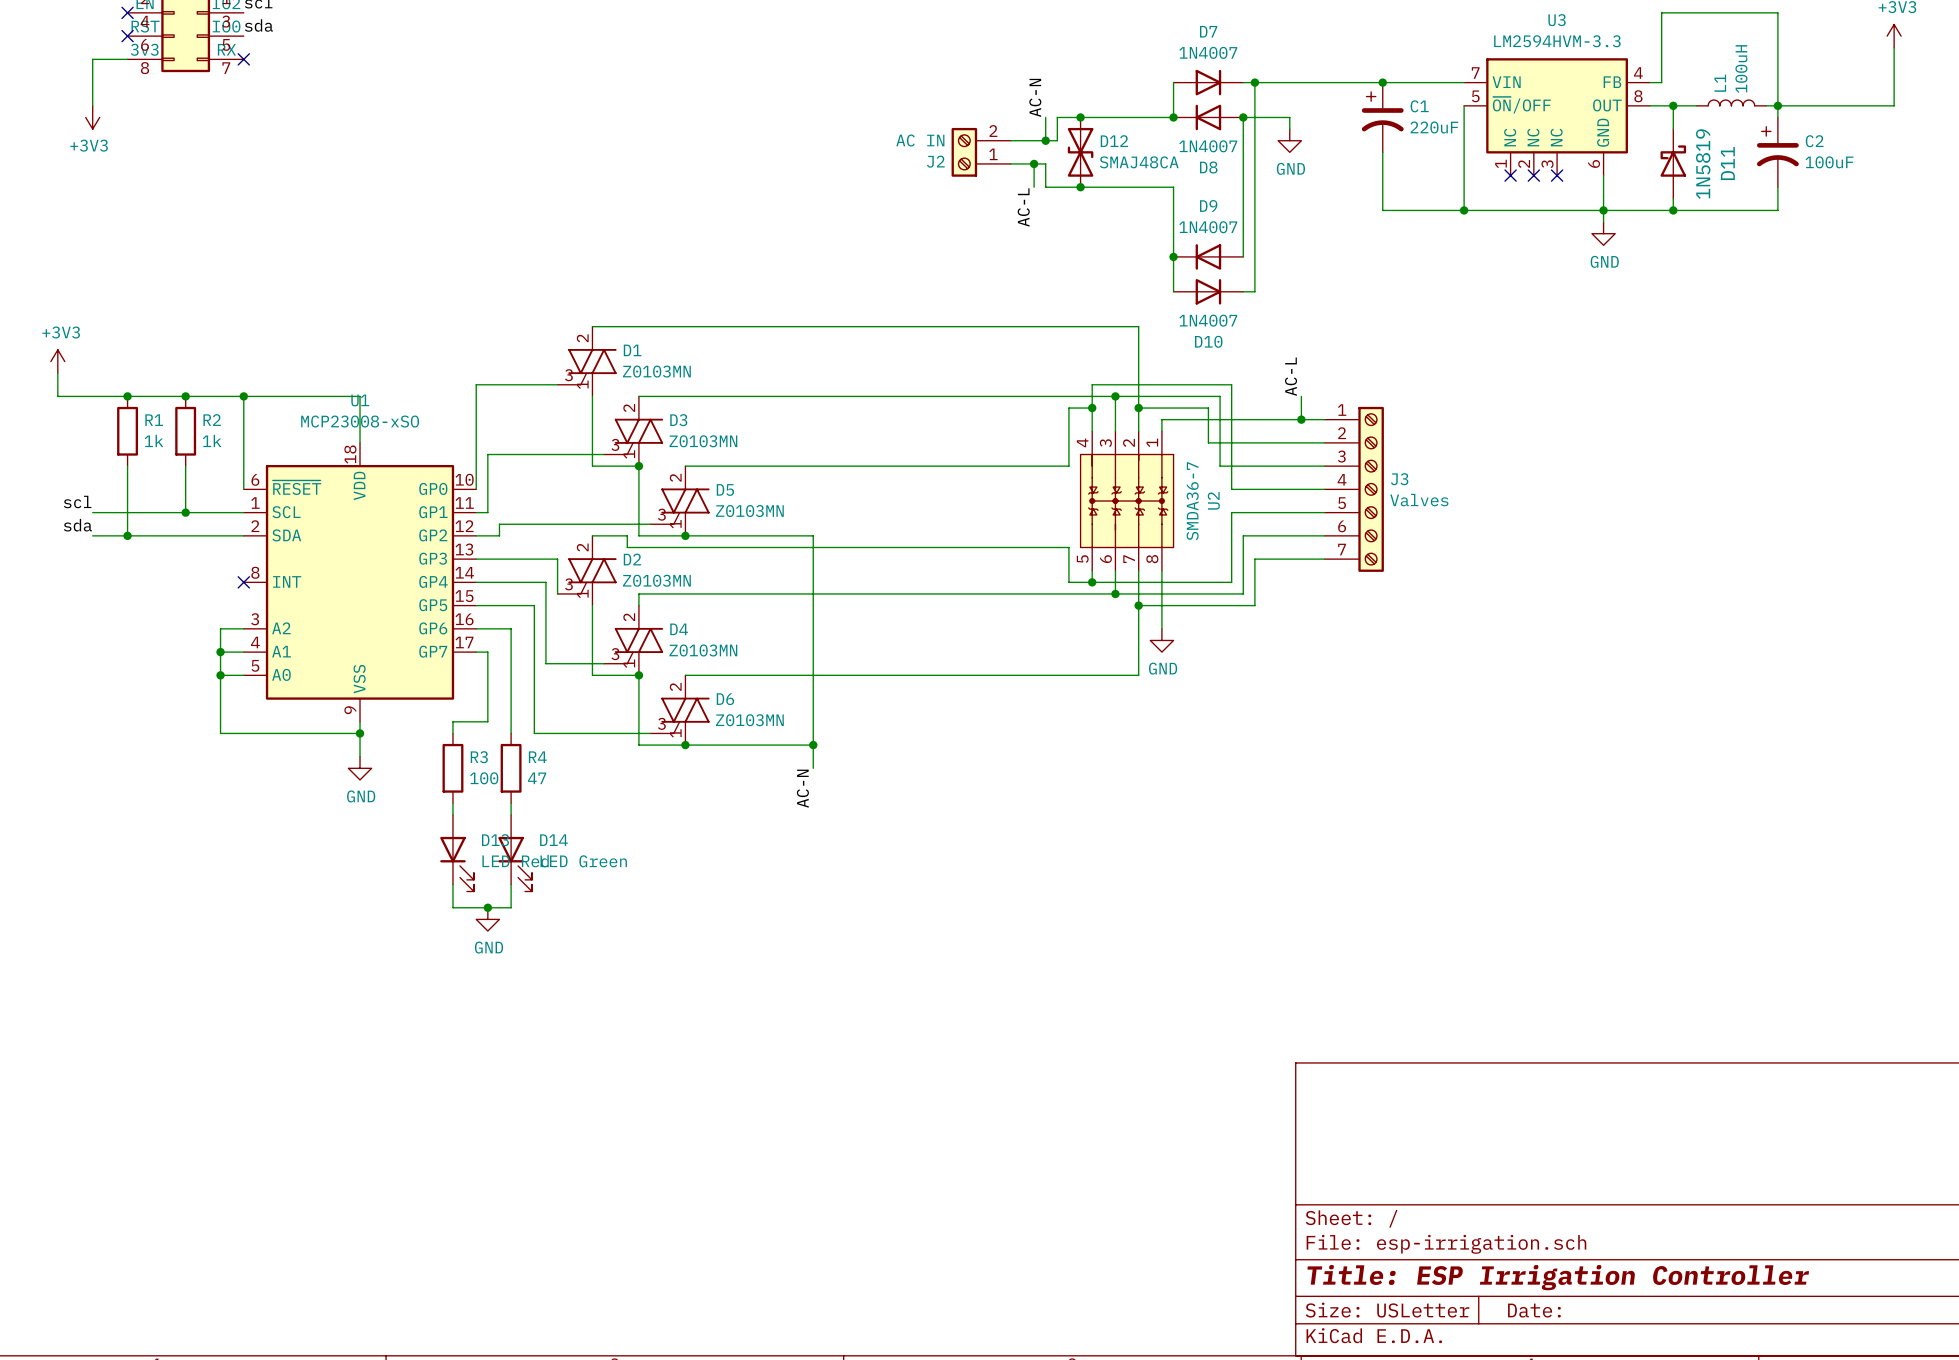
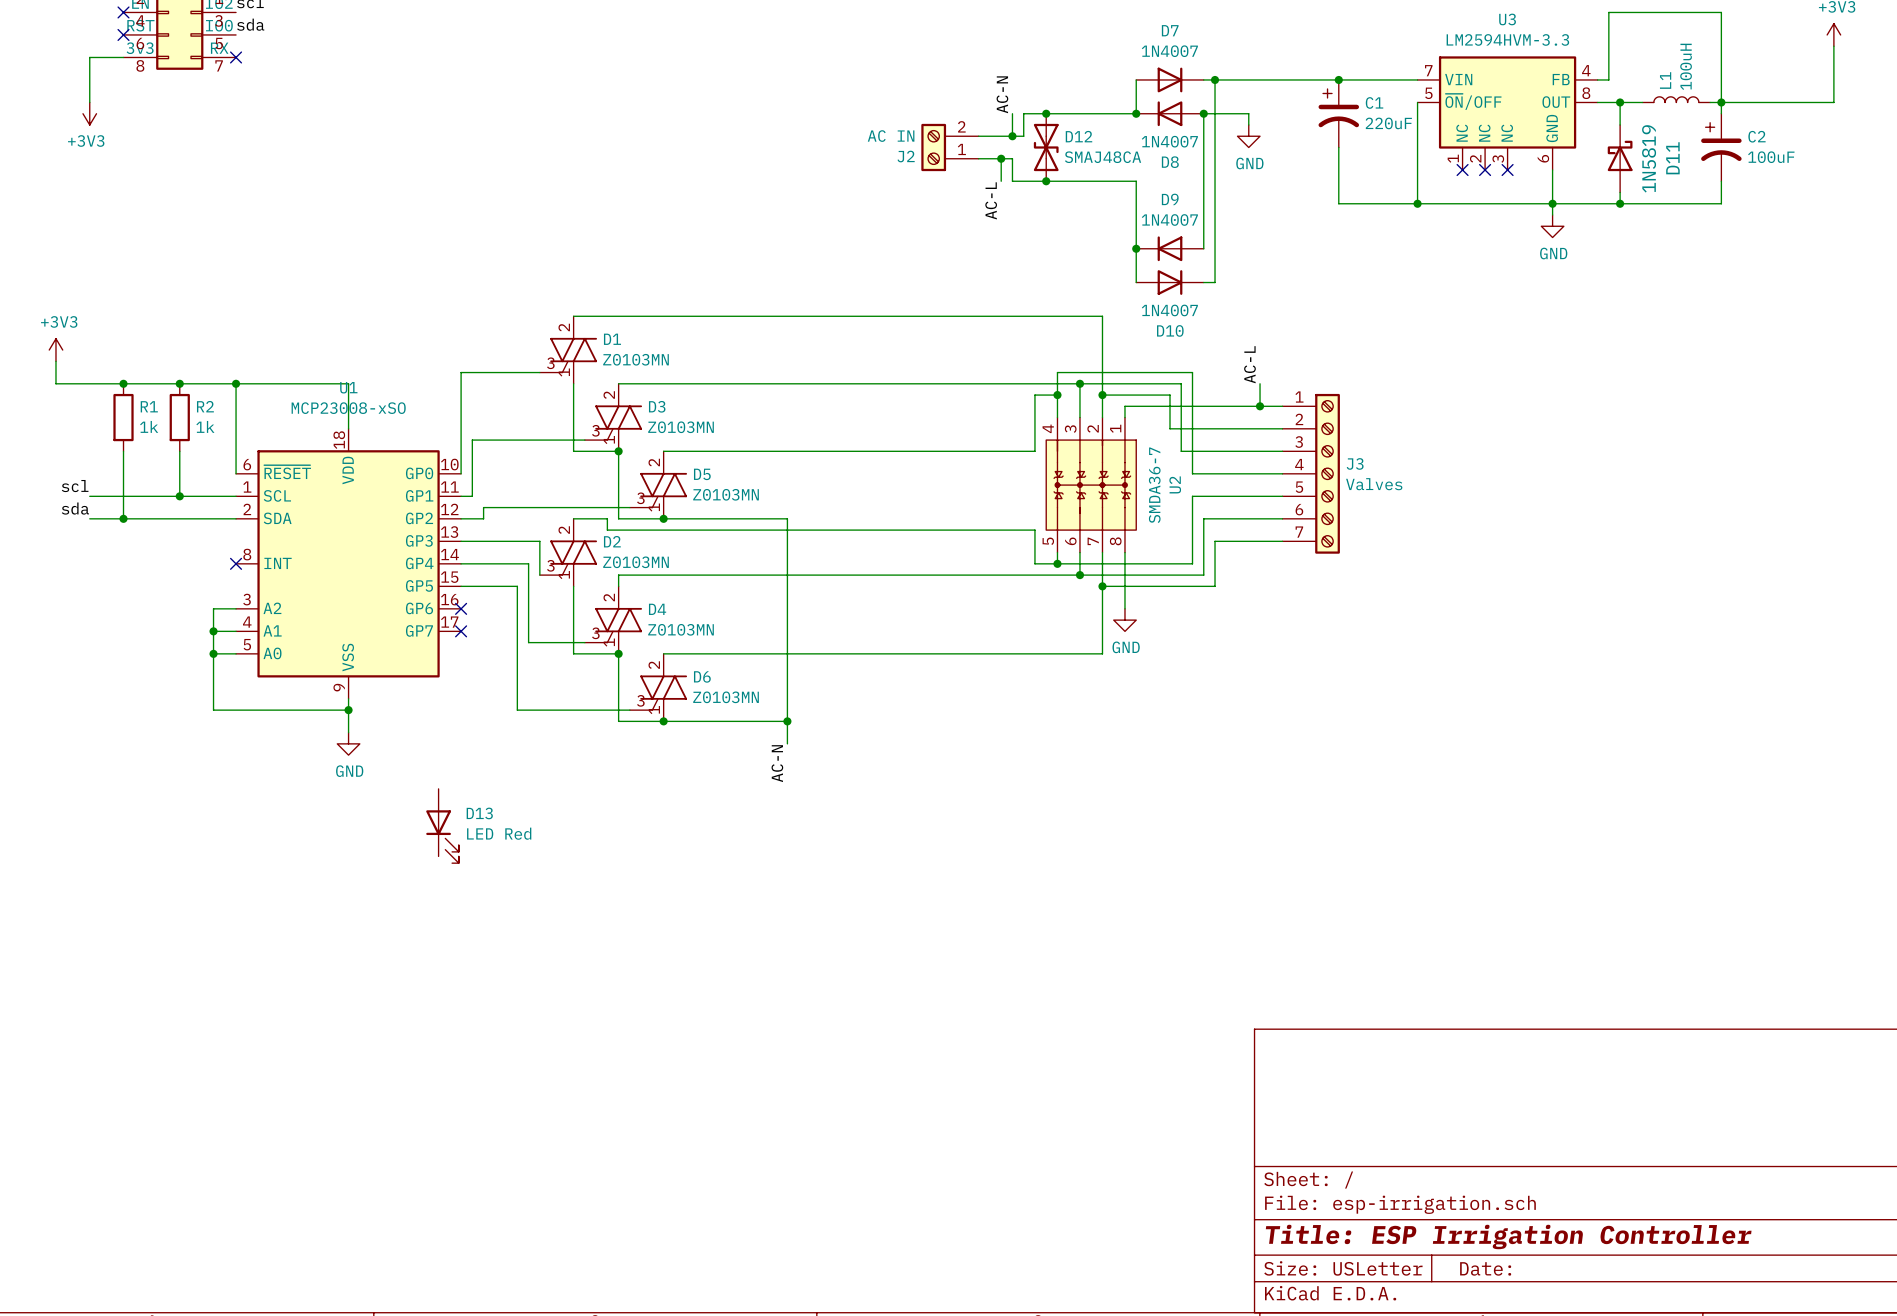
wire: (476, 628) (511, 628) (511, 733) -> none
no-connect mark: none -> (461, 608)
wire: (476, 652) (487, 652) (487, 721) (452, 721) (452, 733) -> none
no-connect mark: none -> (461, 631)
R3: 100 (452, 768) -> none
R4: 47 (511, 768) -> none
wire: (452, 803) (452, 814) -> none
wire: (511, 803) (511, 814) -> none
D14: LED Green (515, 853) -> none
wire: (452, 884) (452, 907) (511, 907) (511, 884) -> none
junction: (487, 907) -> none
power symbol: GND (487, 919) -> none

